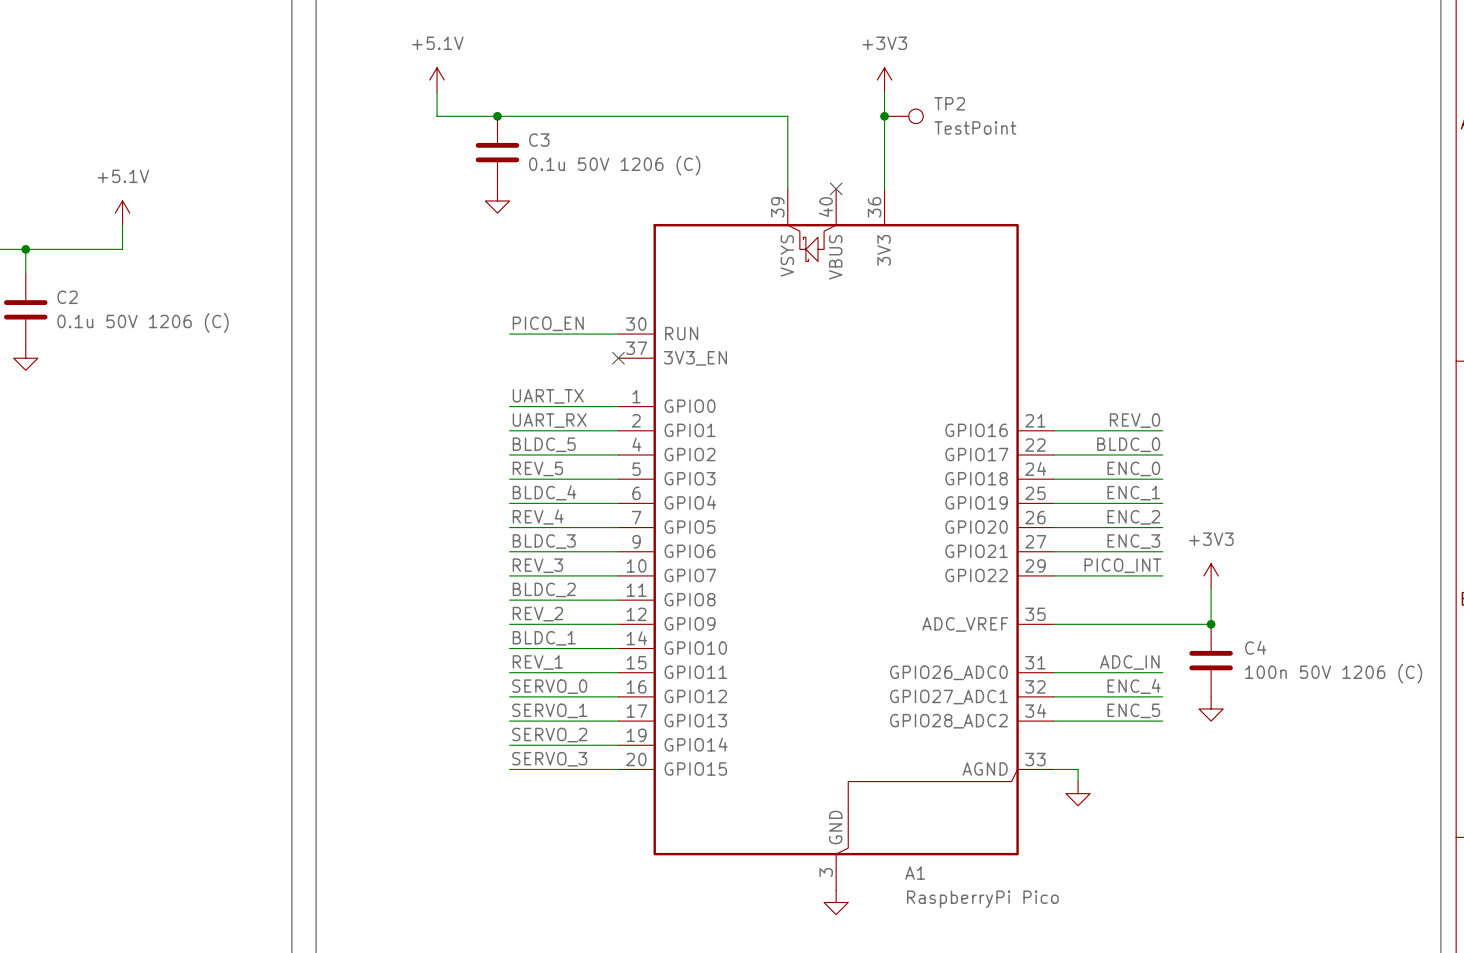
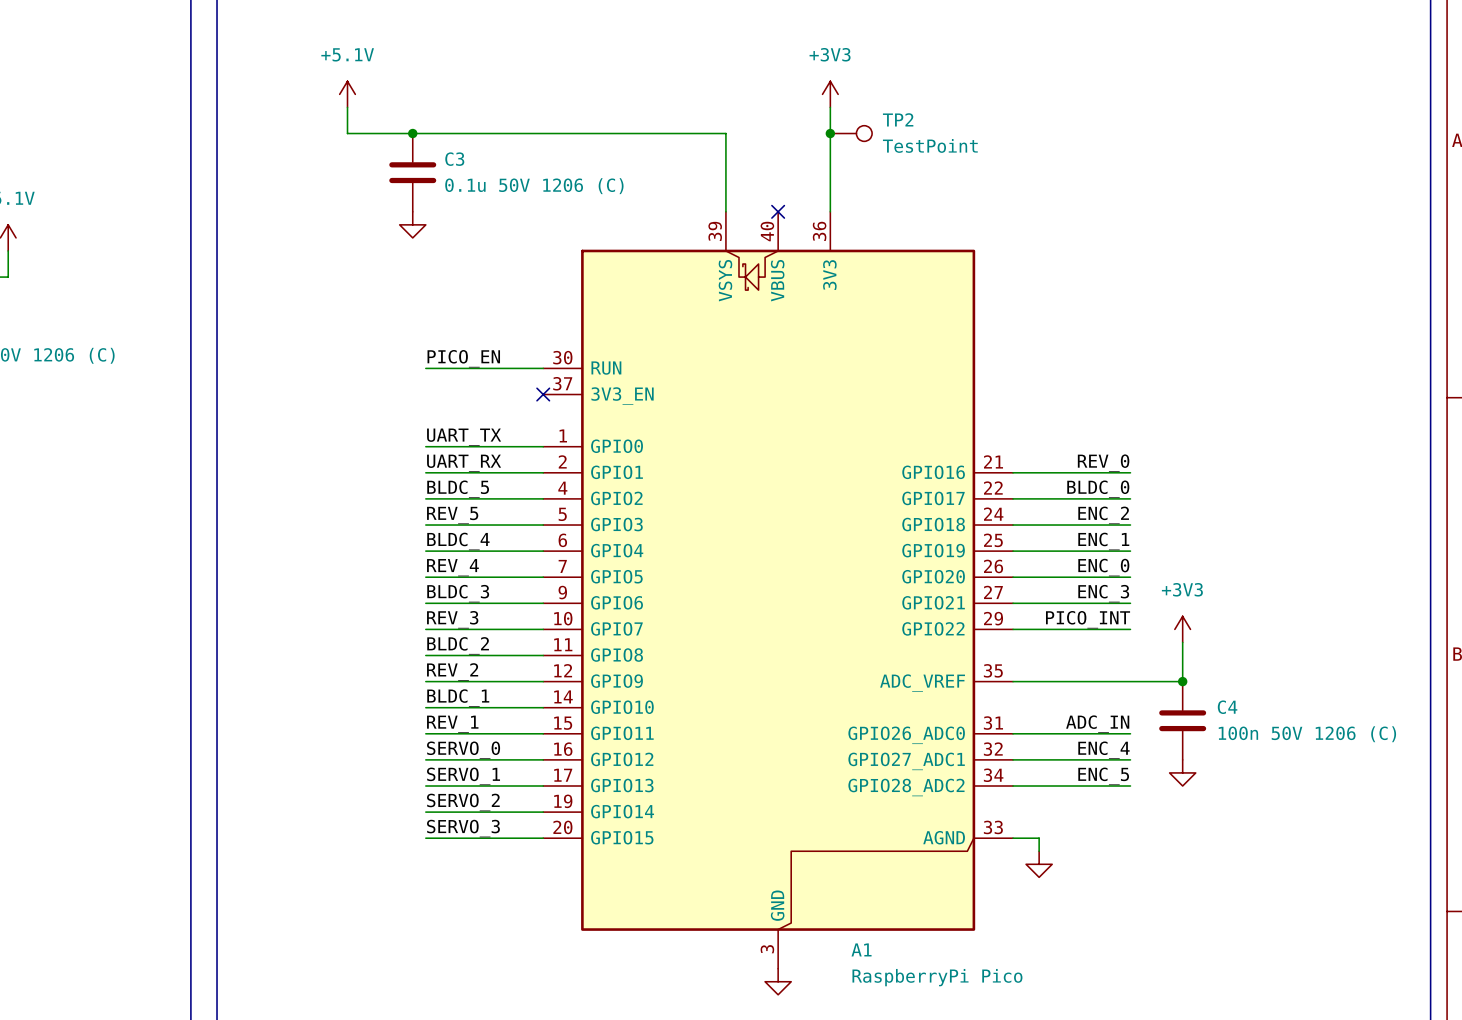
label: ENC_0 (1133, 468) -> ENC_2 (1103, 515)
label: ENC_2 (1133, 517) -> ENC_0 (1103, 567)

